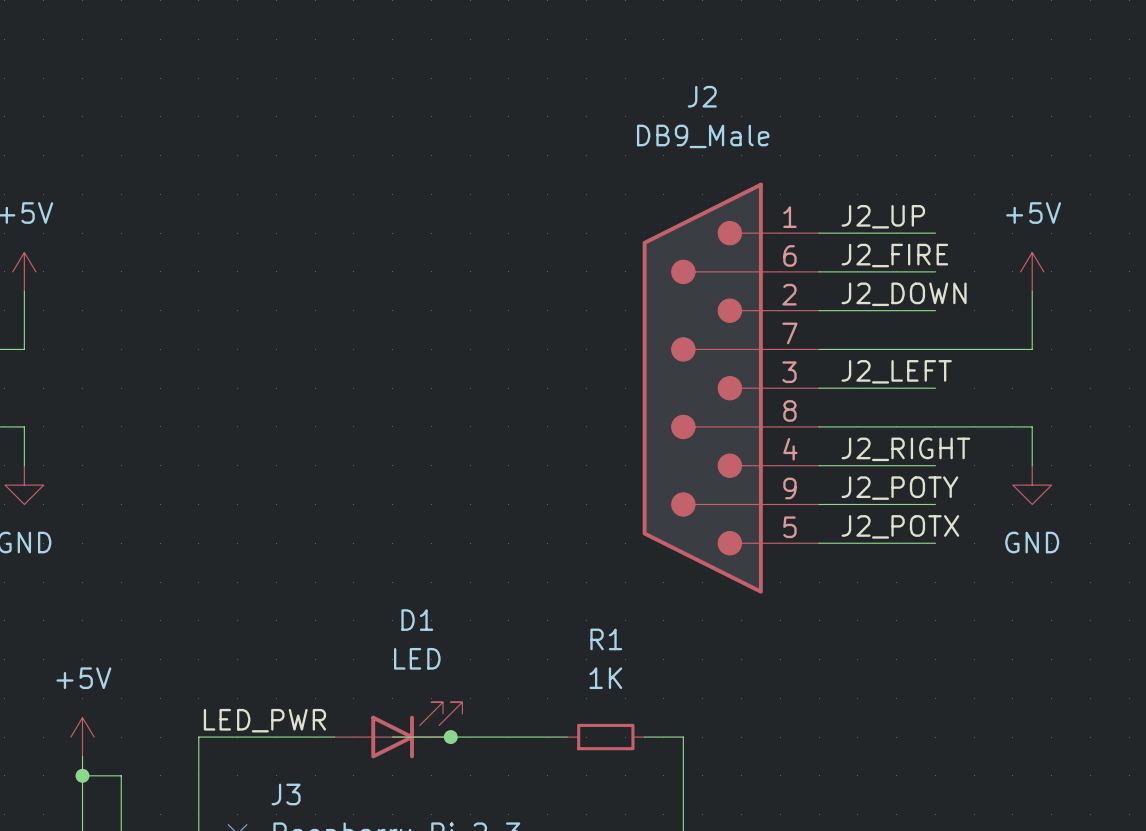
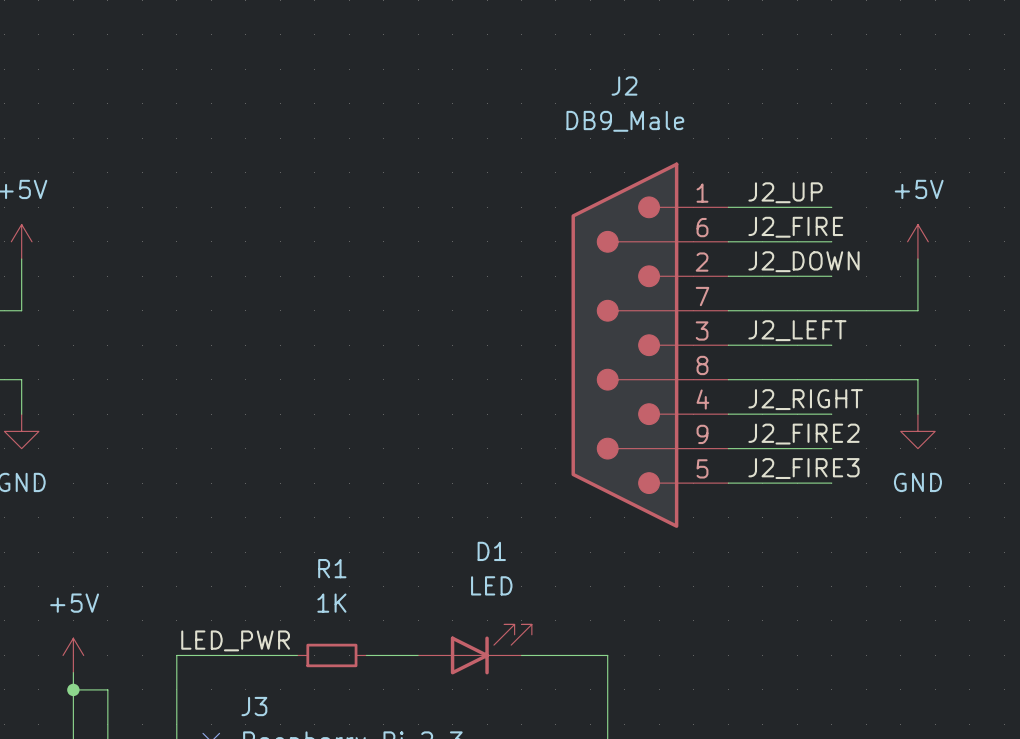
label: J2_POTY (899, 488) -> J2_FIRE2 (803, 434)
label: J2_POTX (900, 526) -> J2_FIRE3 (803, 468)
D1 position: (398, 730) -> (474, 649)
junction: (450, 737) -> none
wire: none -> (521, 655) (573, 655)
R1 position: (605, 737) -> (331, 655)

